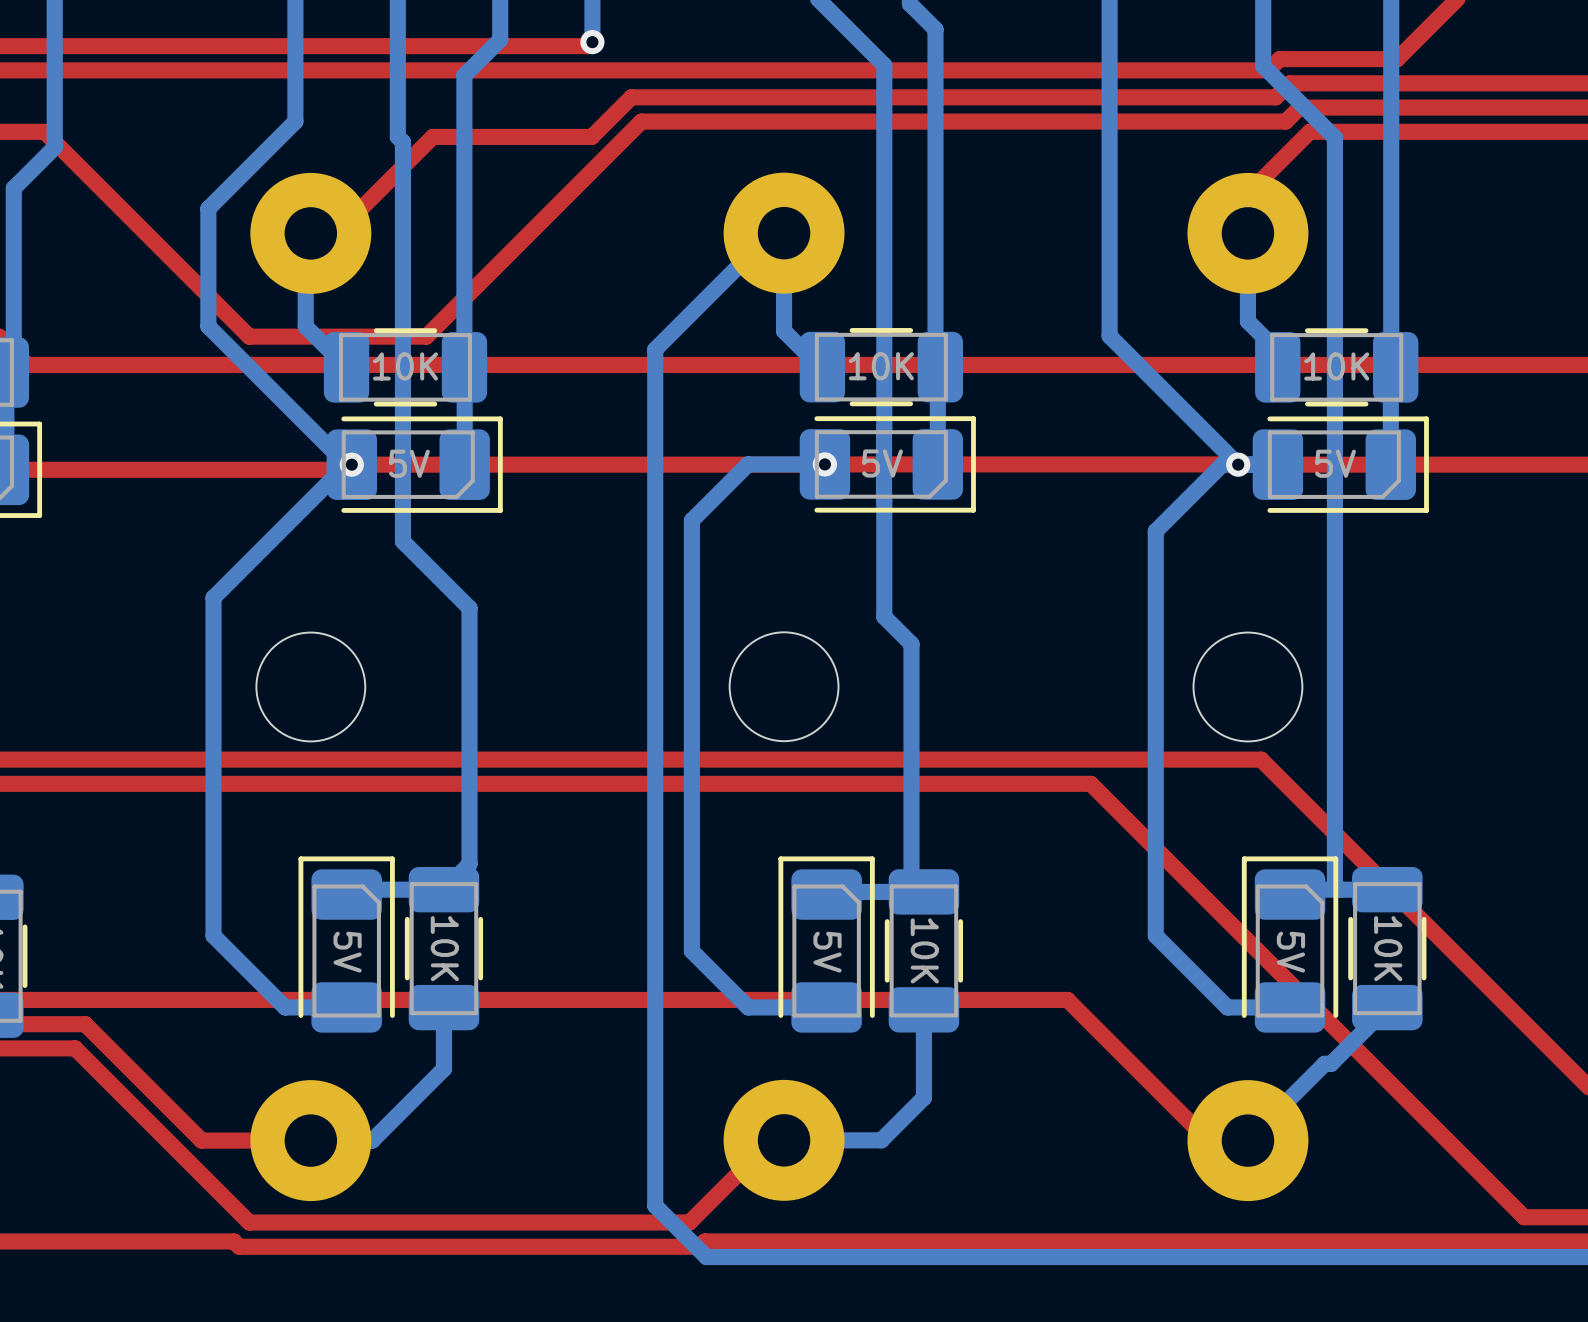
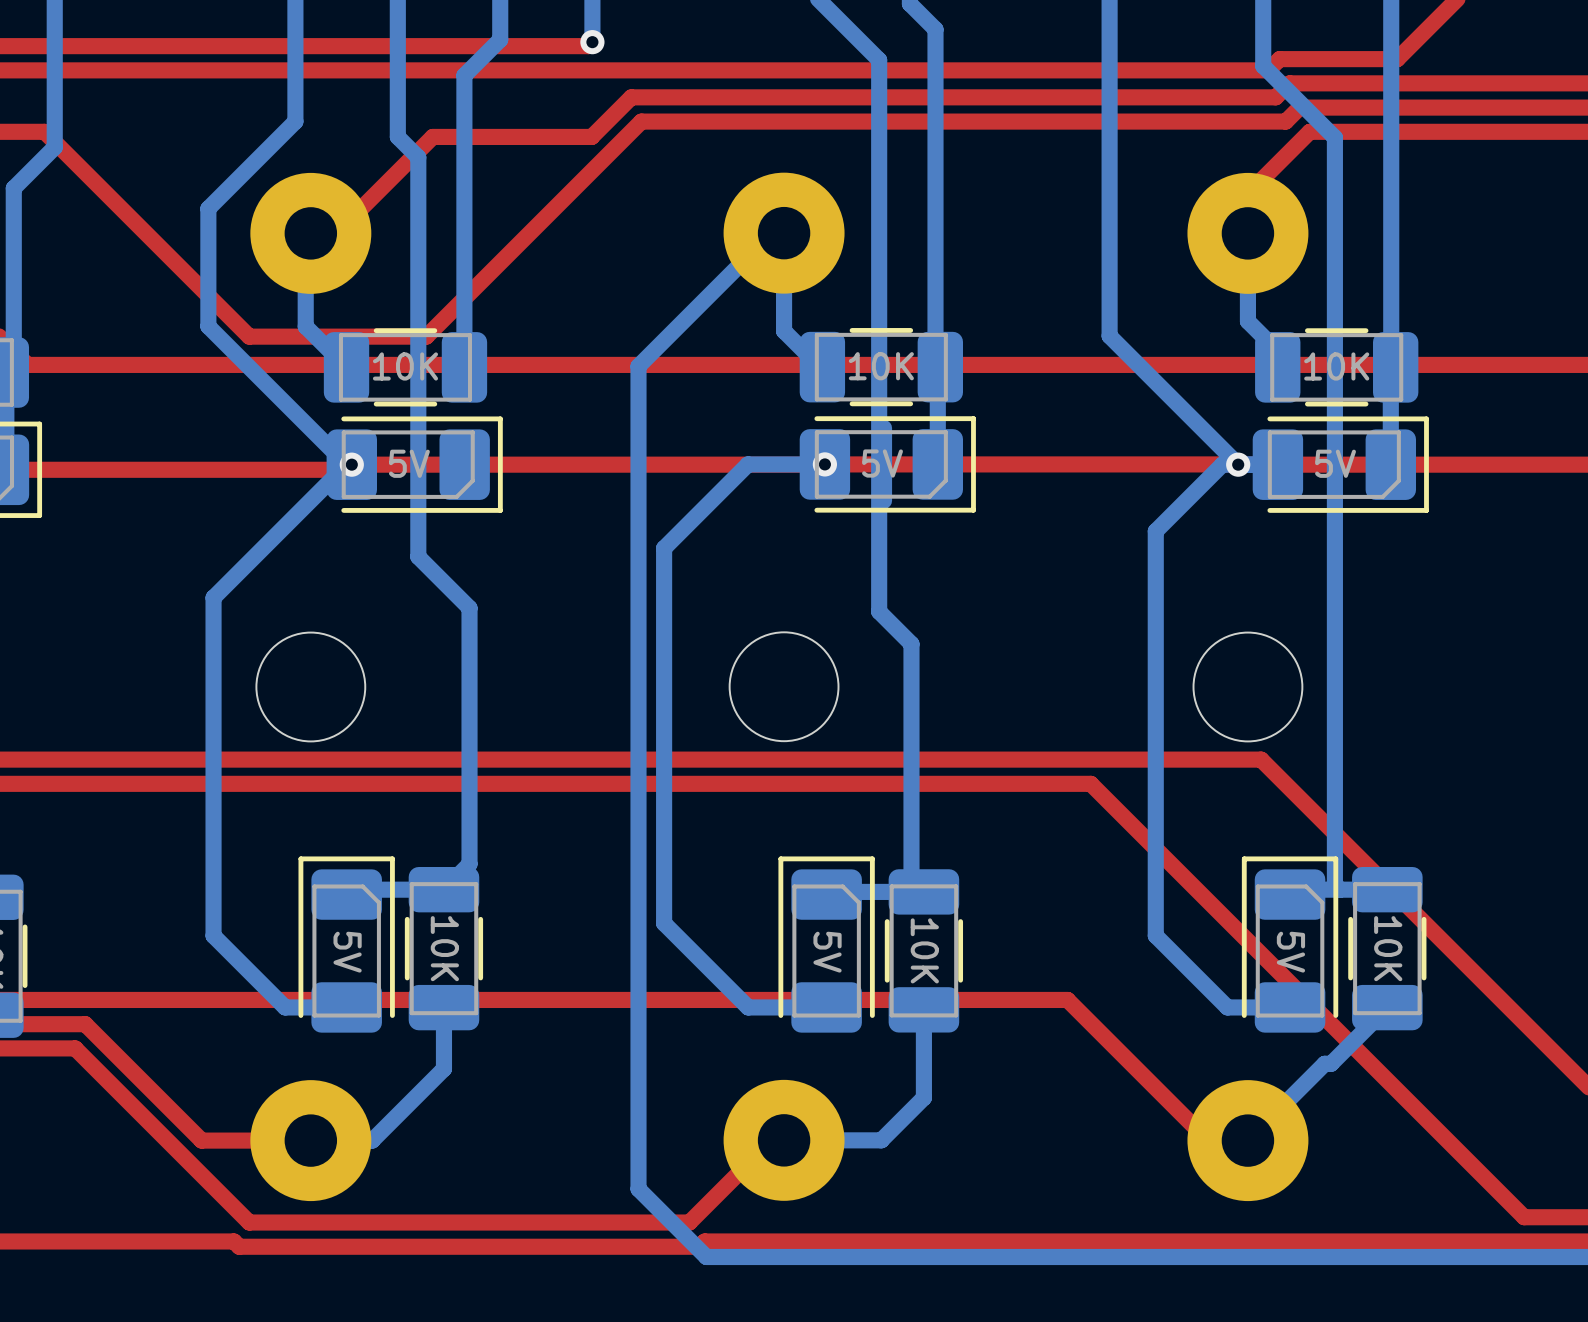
bottom track: (879, 60) (884, 65) (884, 427) -> (879, 60) (879, 611) (884, 616)
bottom track: (402, 142) (402, 541) (418, 556) -> (402, 142) (418, 157) (418, 556)
bottom track: (655, 349) (655, 1205) -> (655, 349) (638, 366) (638, 1189) (655, 1205)
bottom track: (884, 501) (884, 616) -> none
bottom track: (691, 520) (691, 951) -> (691, 520) (664, 548) (664, 923) (691, 951)

